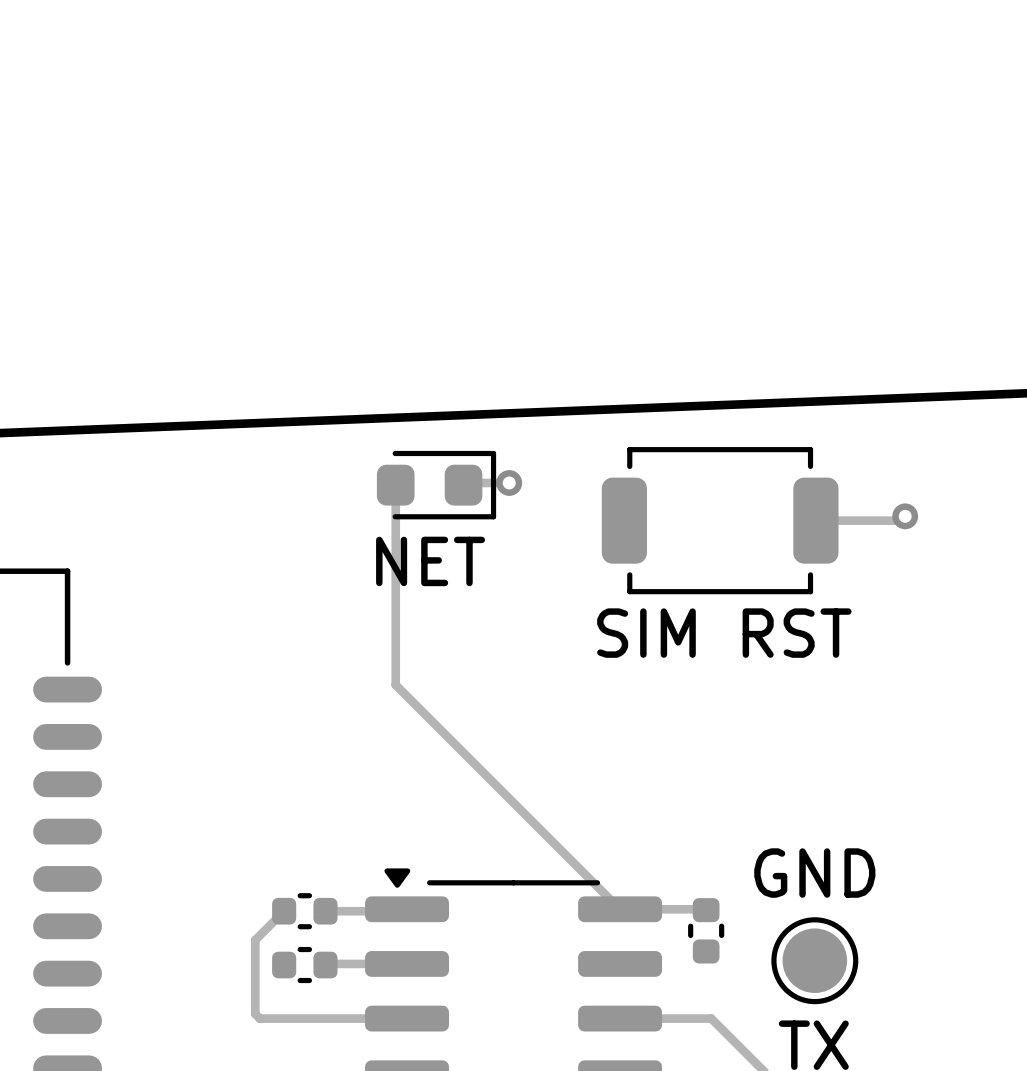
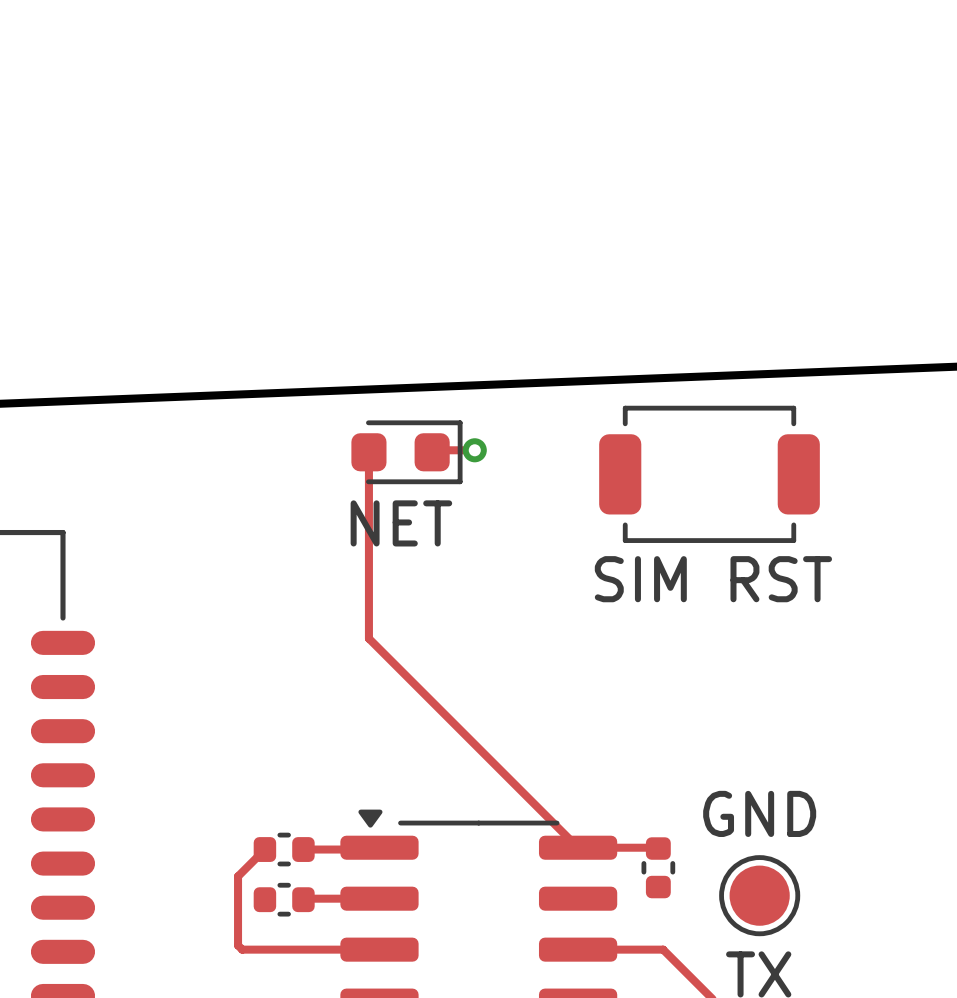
track: (909, 512) (895, 520) (815, 520) -> none
via: (905, 516) -> none
part position: (720, 520) -> (709, 474)

